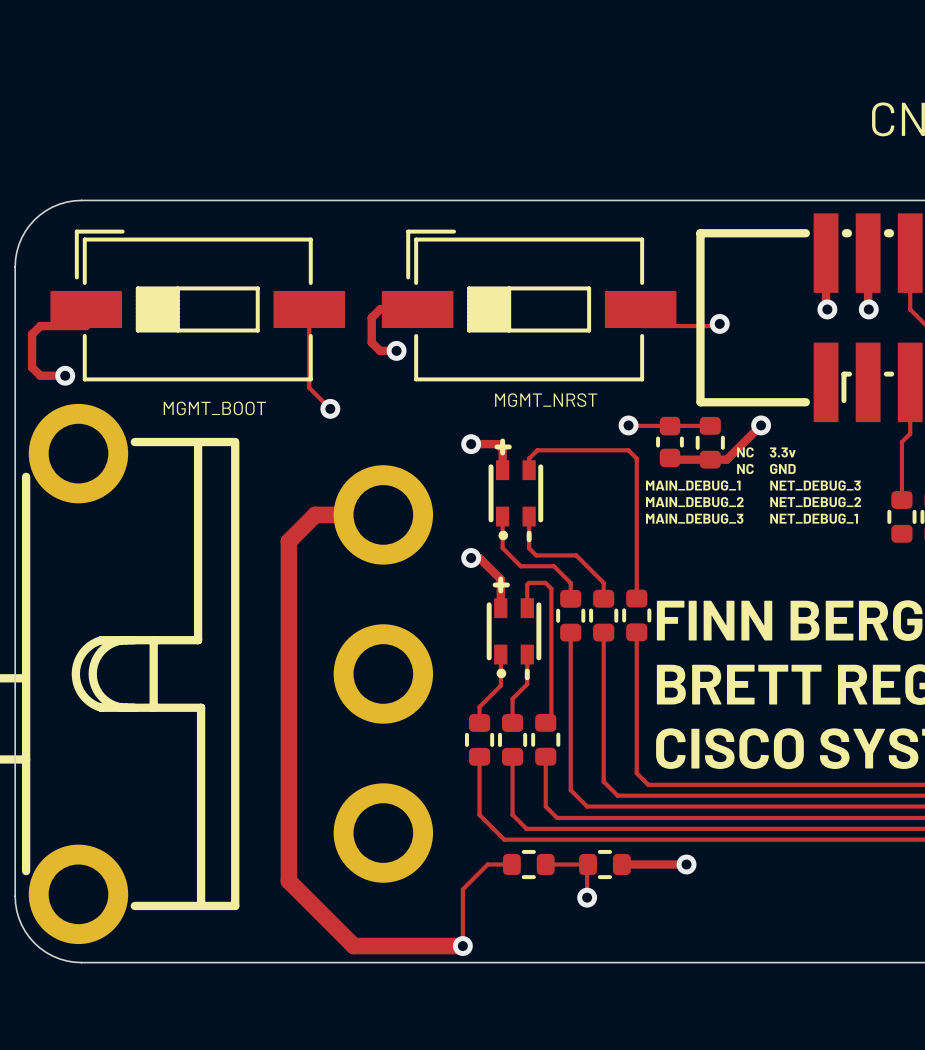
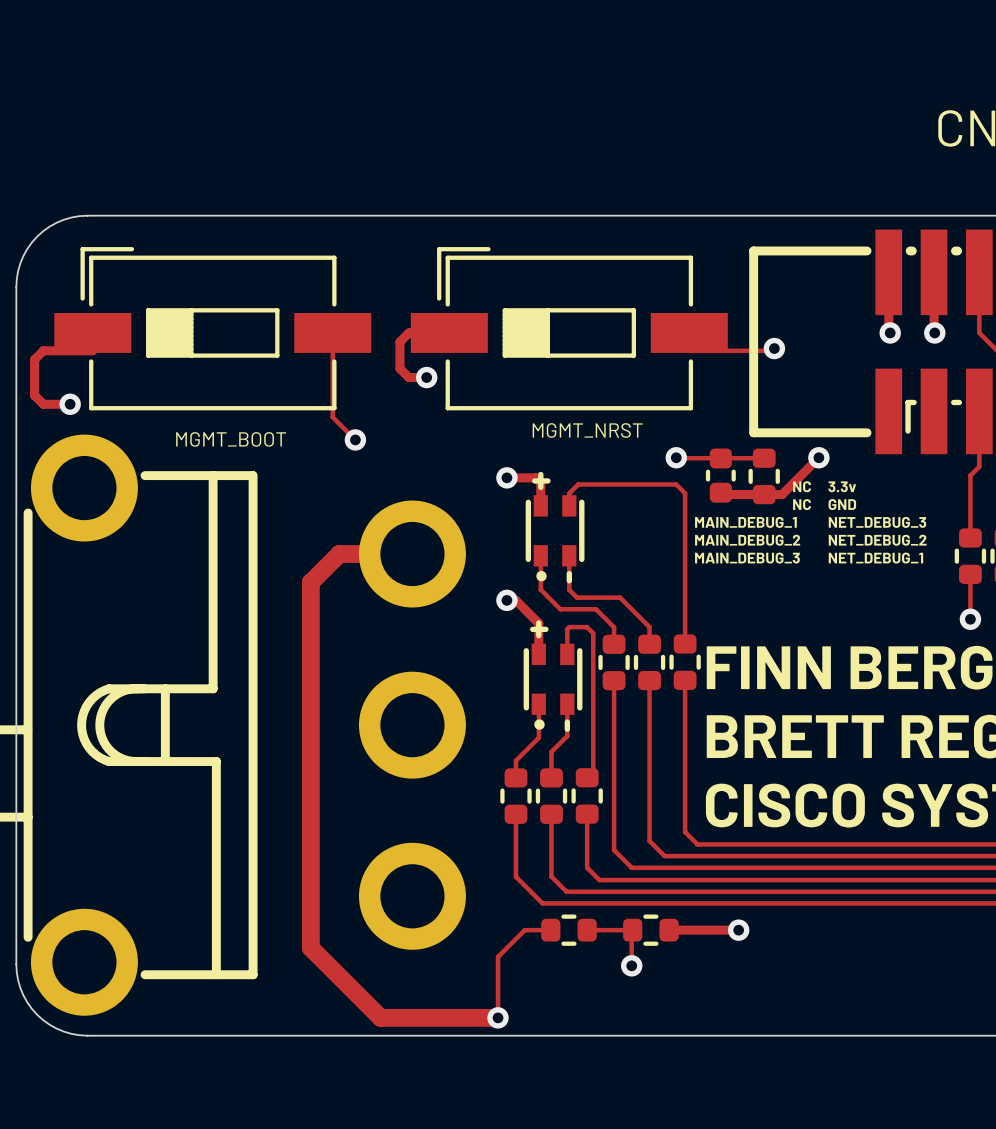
track: none -> (970, 574) (970, 619)
via: none -> (970, 619)

